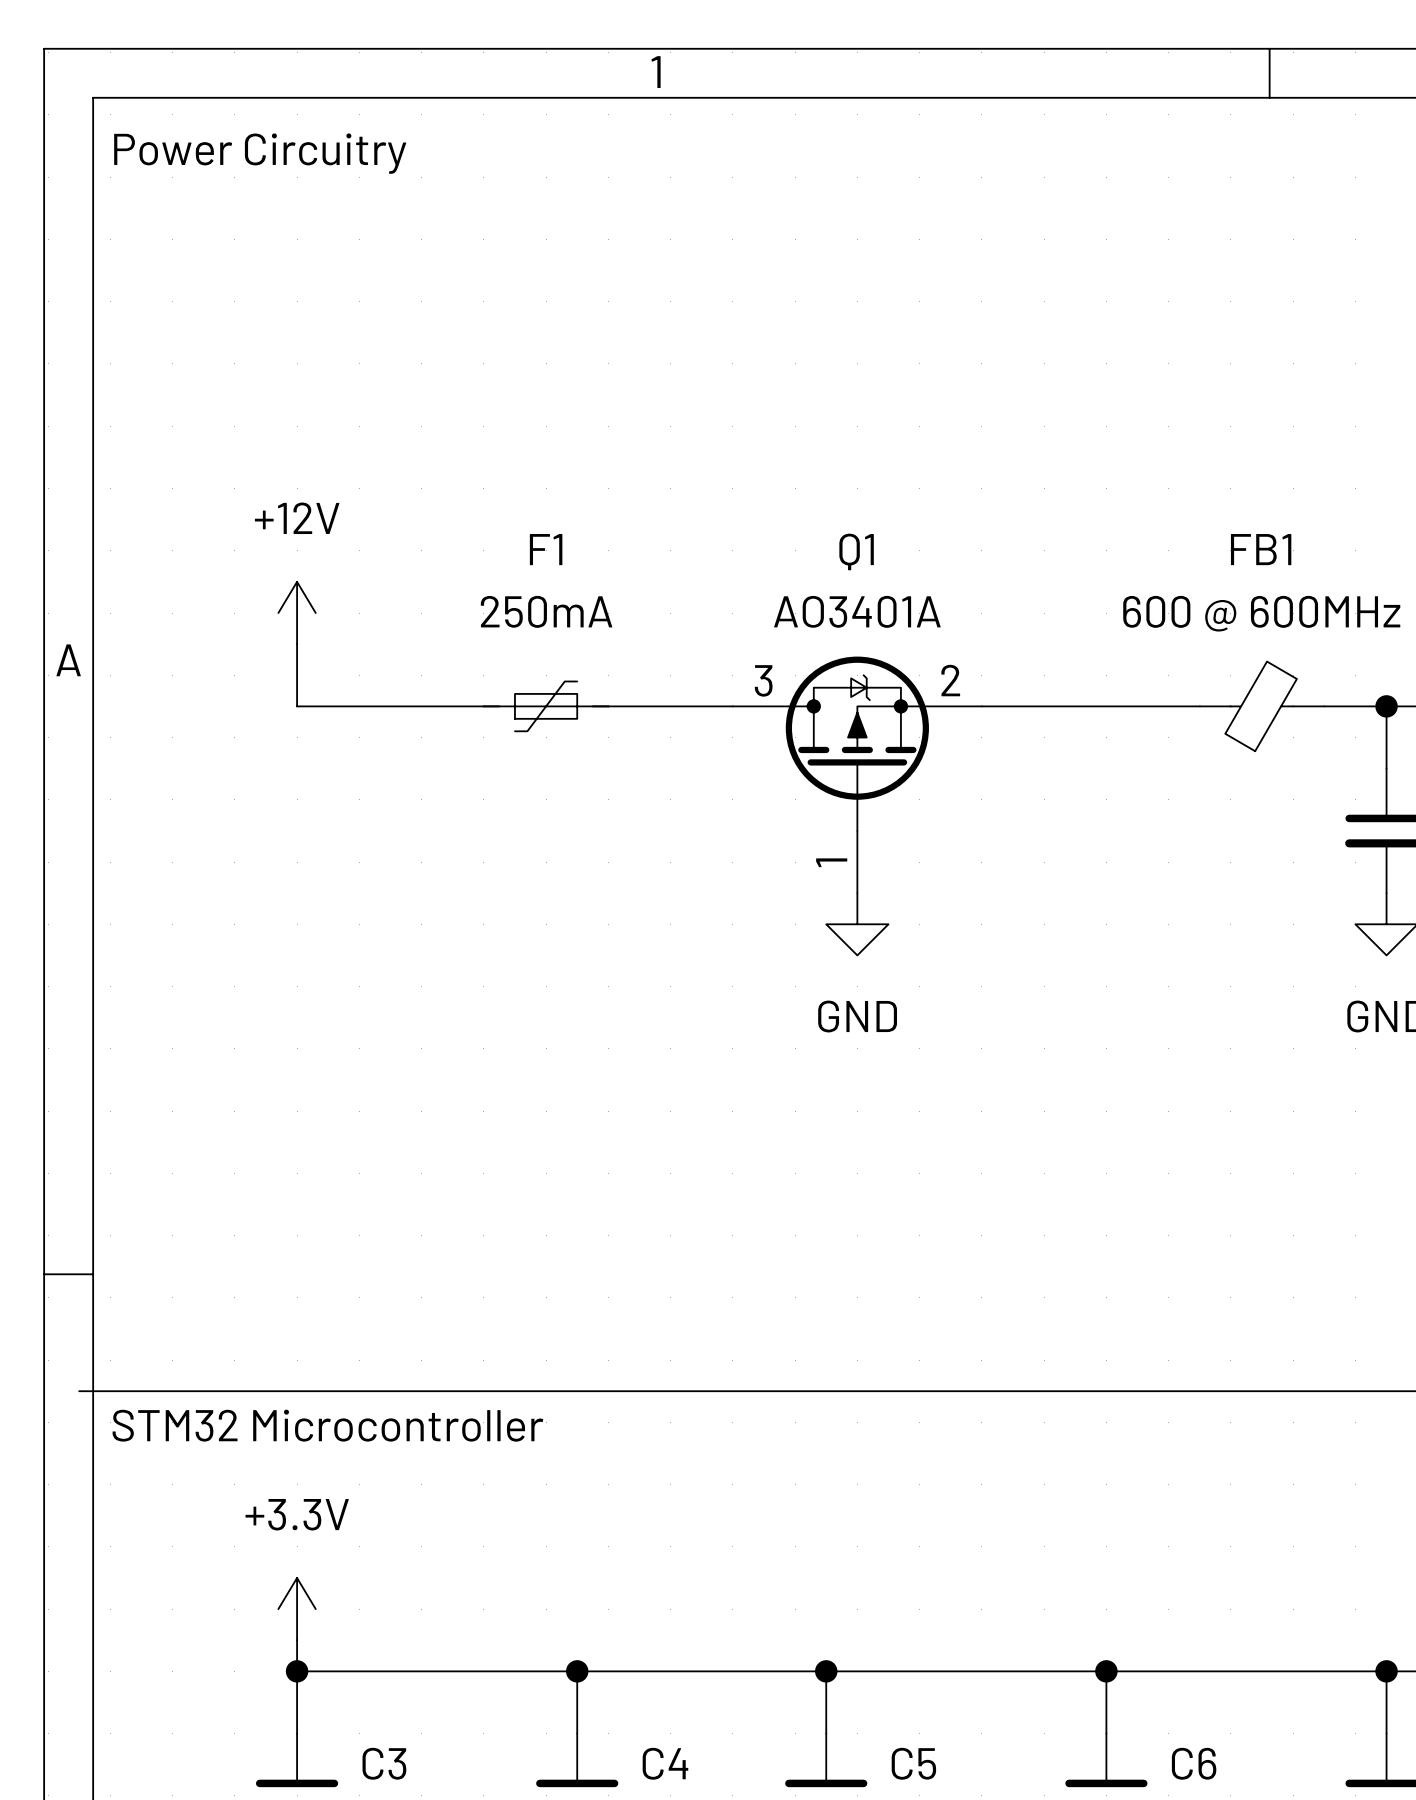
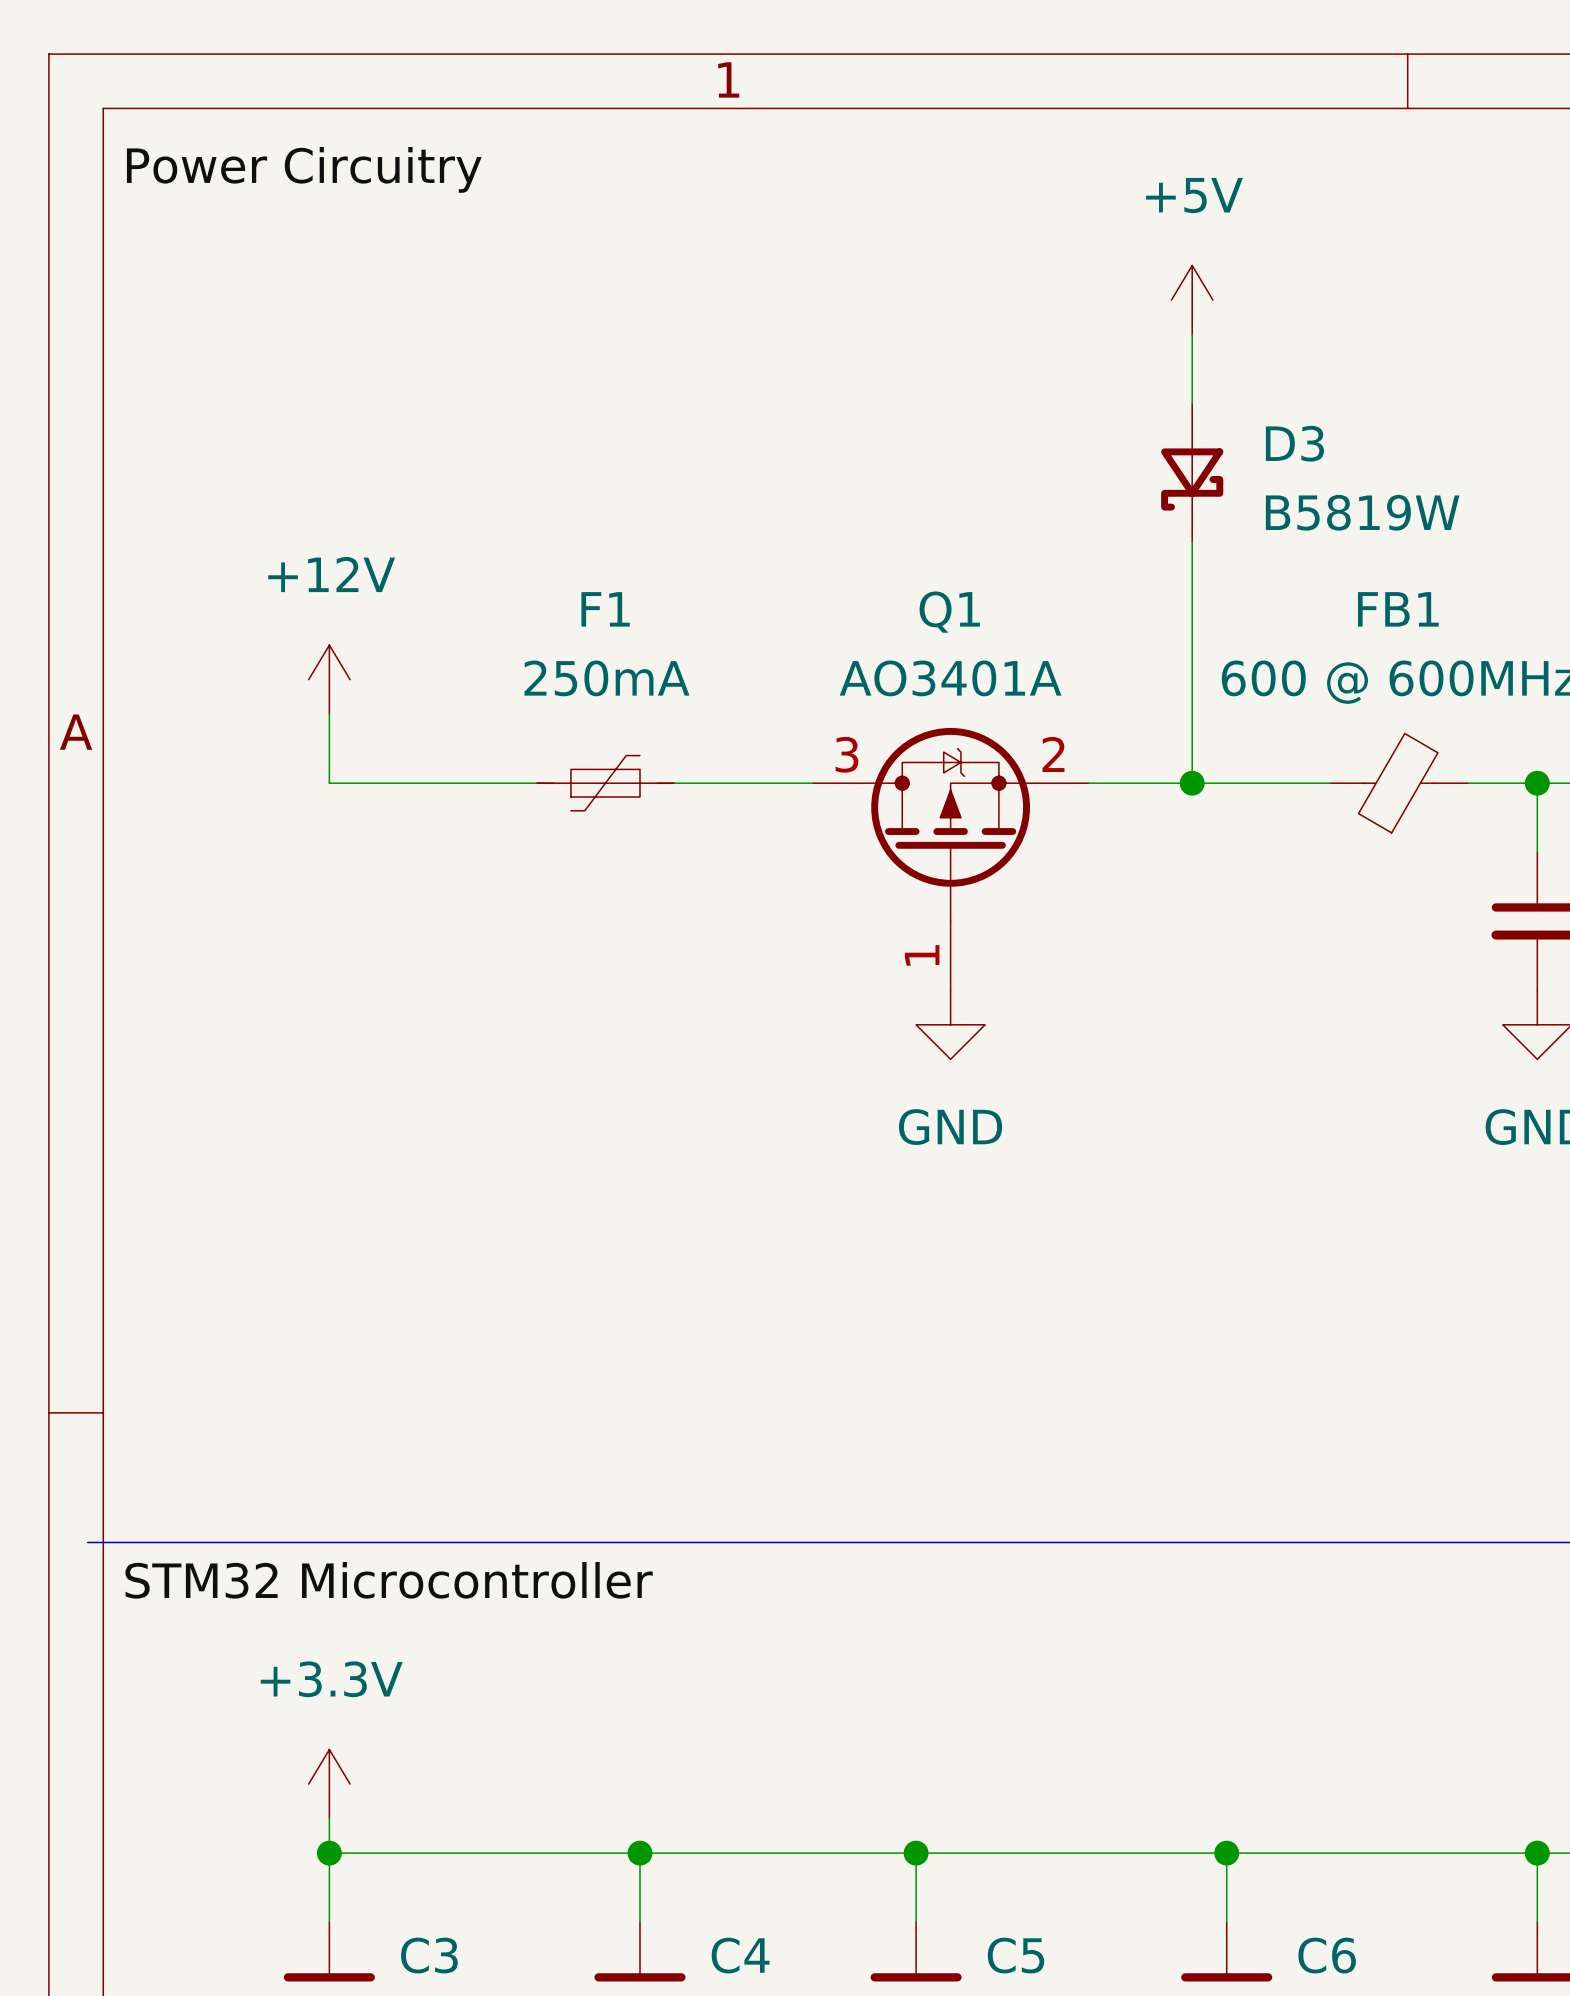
power symbol: none -> +5V (1192, 300)
wire: none -> (1192, 334) (1192, 403)
D3: none -> B5819W (1192, 472)
wire: none -> (1192, 541) (1192, 783)
junction: none -> (1192, 783)

